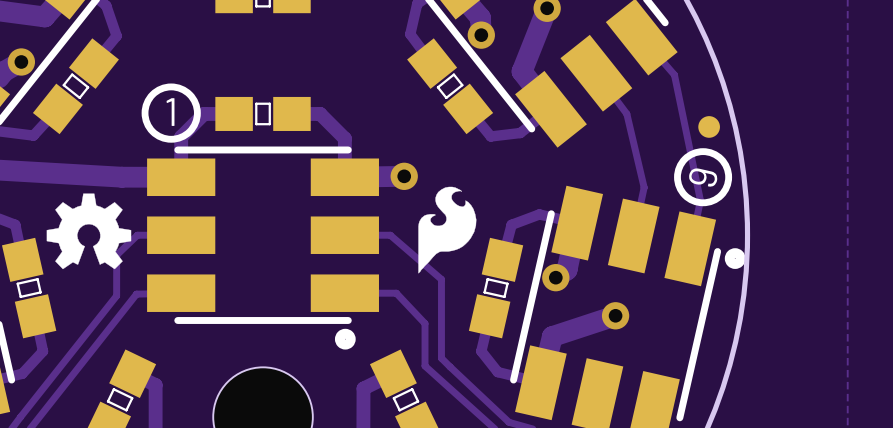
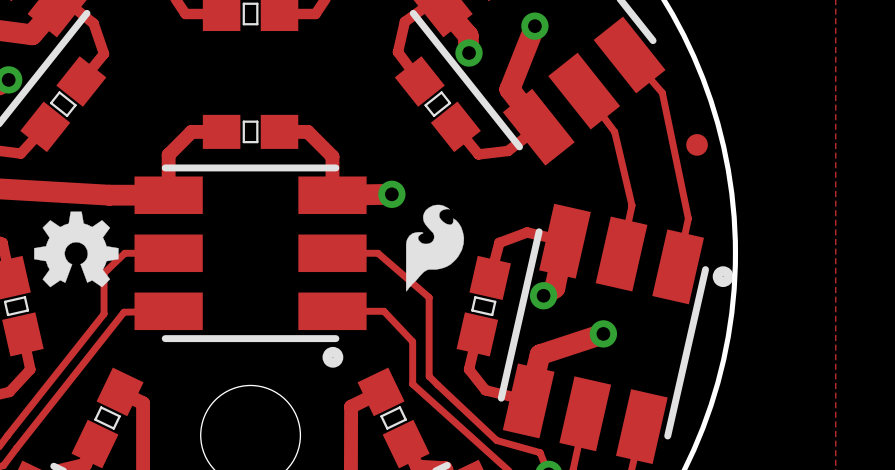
drawing: [141, 83, 201, 143] -> none
text: 1 (170, 112) -> none
drawing: [674, 148, 733, 207] -> none
text: 6 (703, 177) -> none

